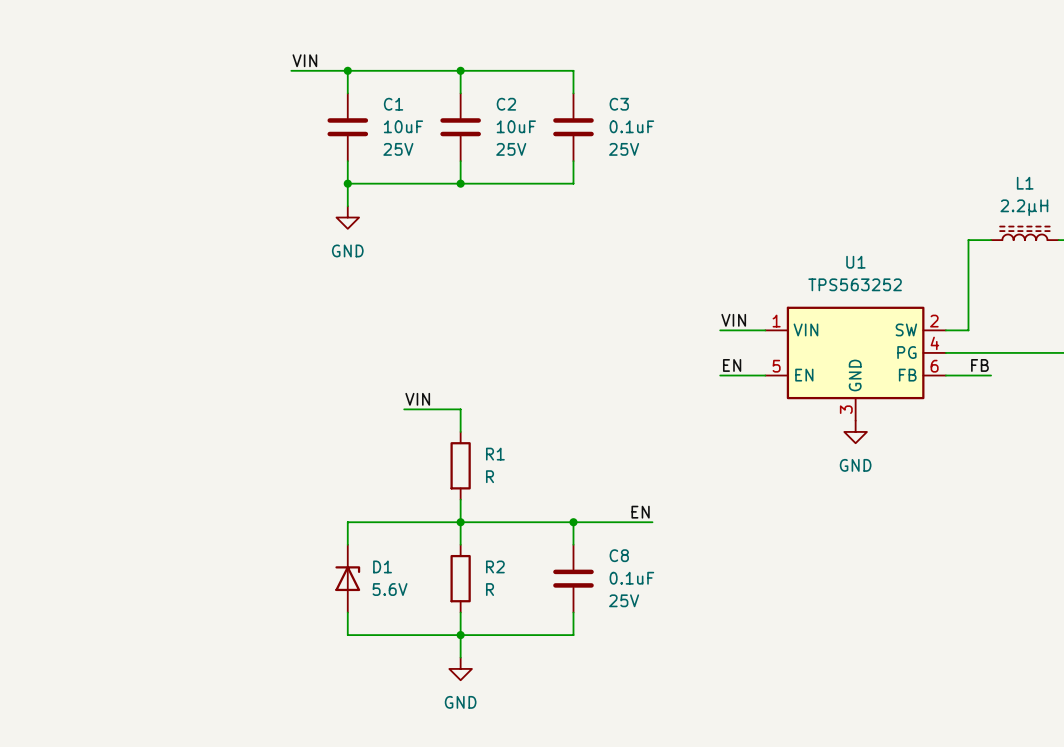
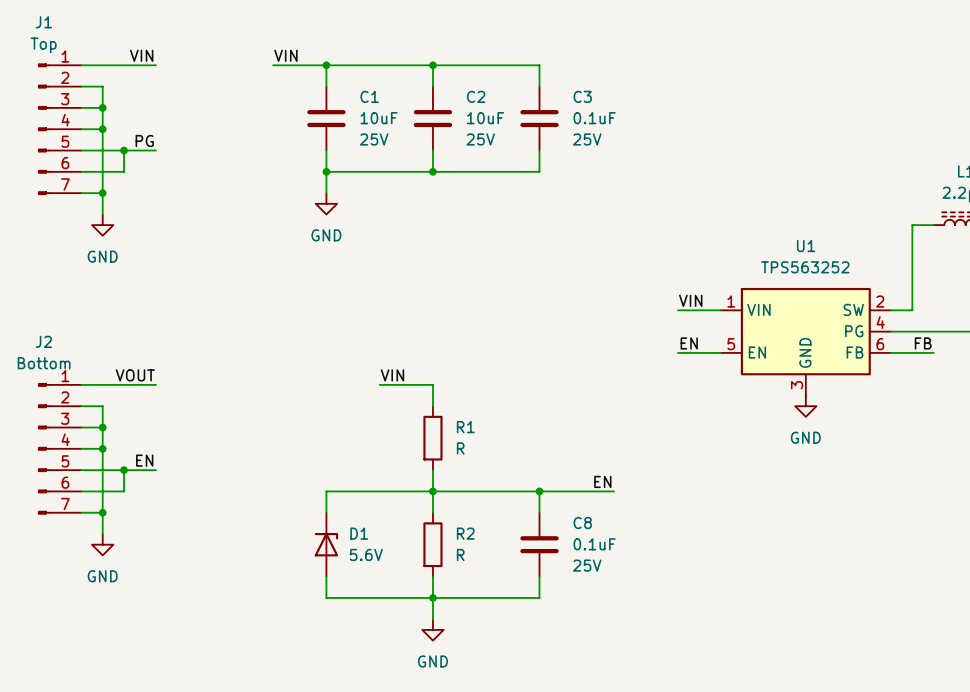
label: none -> VIN (141, 55)
wire: none -> (81, 65) (155, 65)
wire: none -> (81, 86) (102, 86) (102, 214)
wire: none -> (81, 107) (102, 107)
junction: none -> (102, 107)
J1: none -> Top (59, 129)
wire: none -> (81, 129) (102, 129)
junction: none -> (102, 129)
label: none -> PG (144, 141)
wire: none -> (81, 150) (155, 150)
wire: none -> (124, 150) (124, 171) (81, 171)
junction: none -> (124, 150)
wire: none -> (81, 193) (102, 193)
junction: none -> (102, 193)
power symbol: none -> GND (102, 225)
label: none -> VOUT (135, 375)
wire: none -> (81, 384) (155, 384)
wire: none -> (81, 406) (102, 406) (102, 534)
wire: none -> (81, 427) (102, 427)
junction: none -> (102, 427)
J2: none -> Bottom (59, 448)
wire: none -> (81, 448) (102, 448)
junction: none -> (102, 448)
label: none -> EN (144, 460)
wire: none -> (81, 470) (155, 470)
wire: none -> (124, 470) (124, 491) (81, 491)
junction: none -> (124, 470)
wire: none -> (81, 512) (102, 512)
junction: none -> (102, 512)
power symbol: none -> GND (102, 544)

